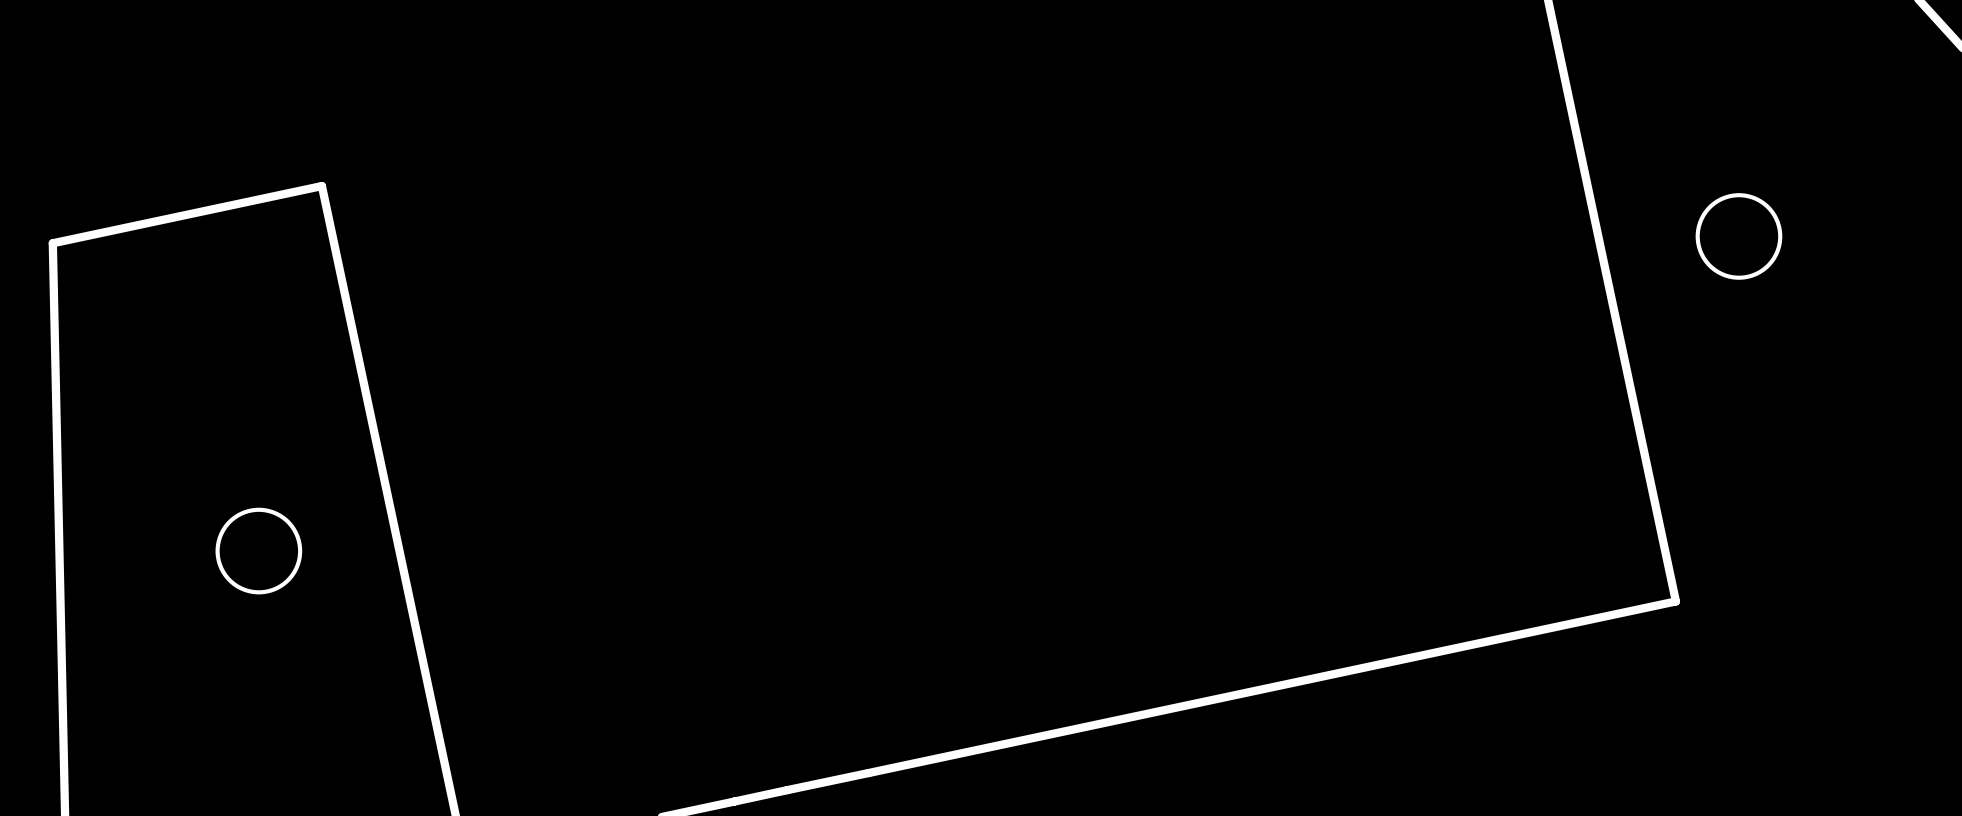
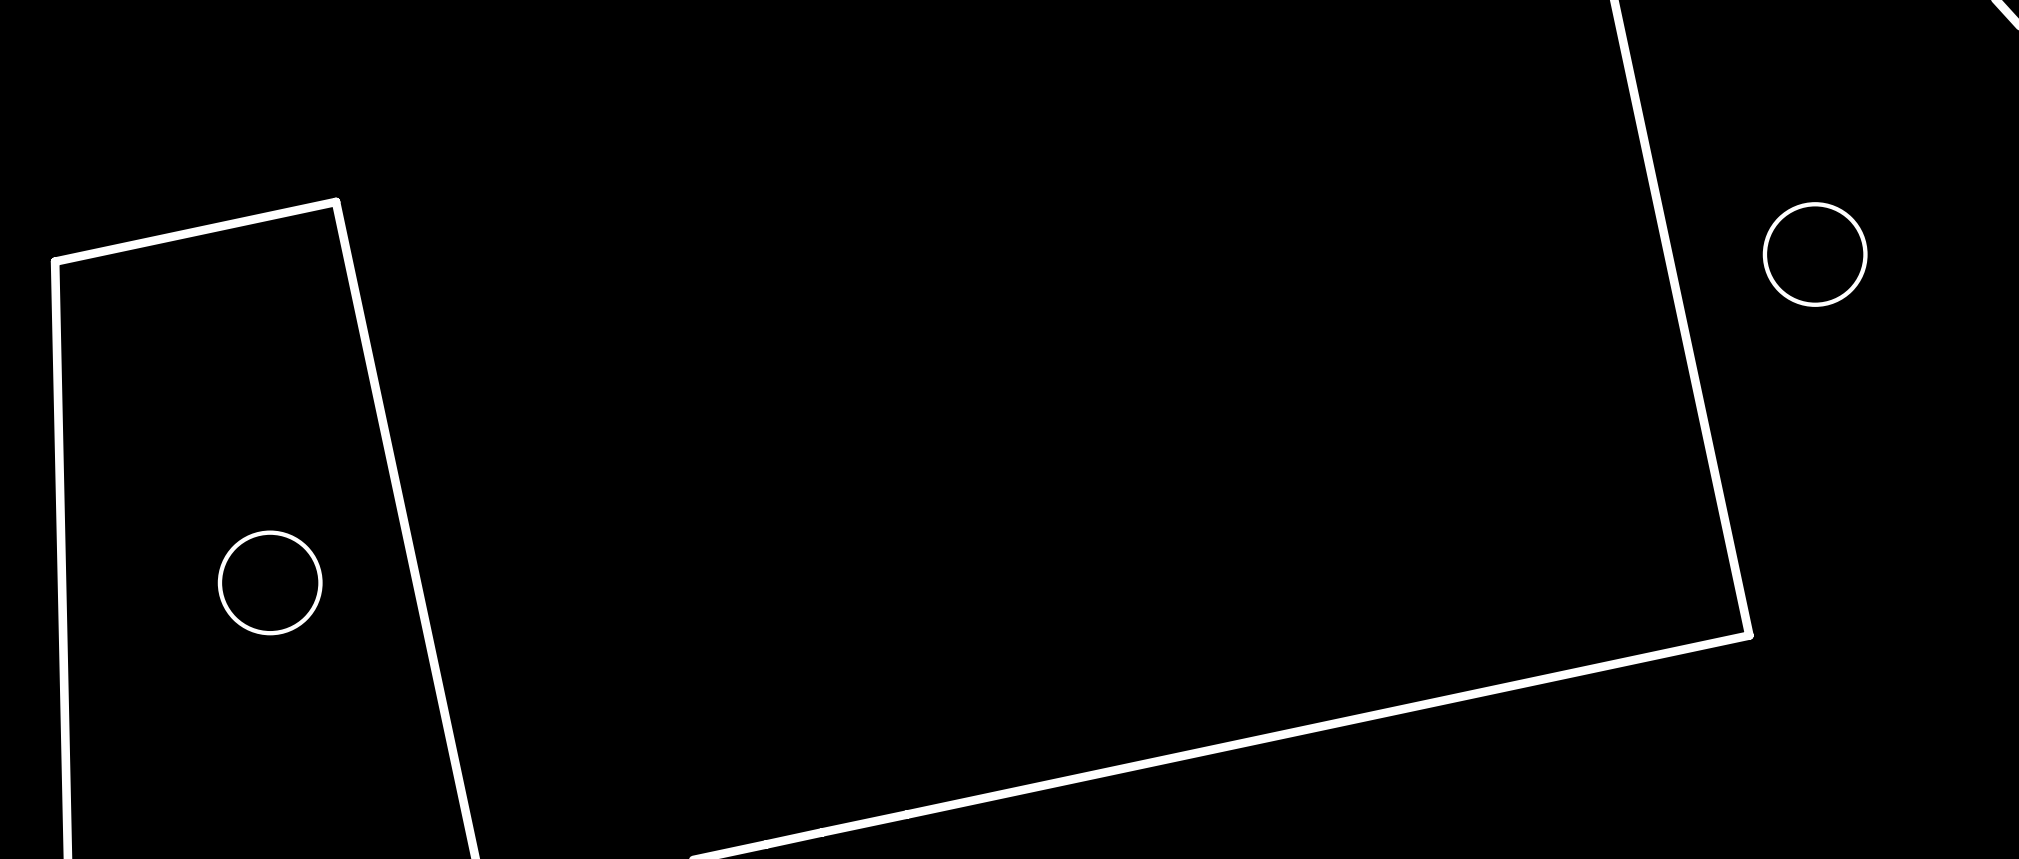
drawing shape: [215, 193, 1783, 595] -> [217, 202, 1868, 636]

